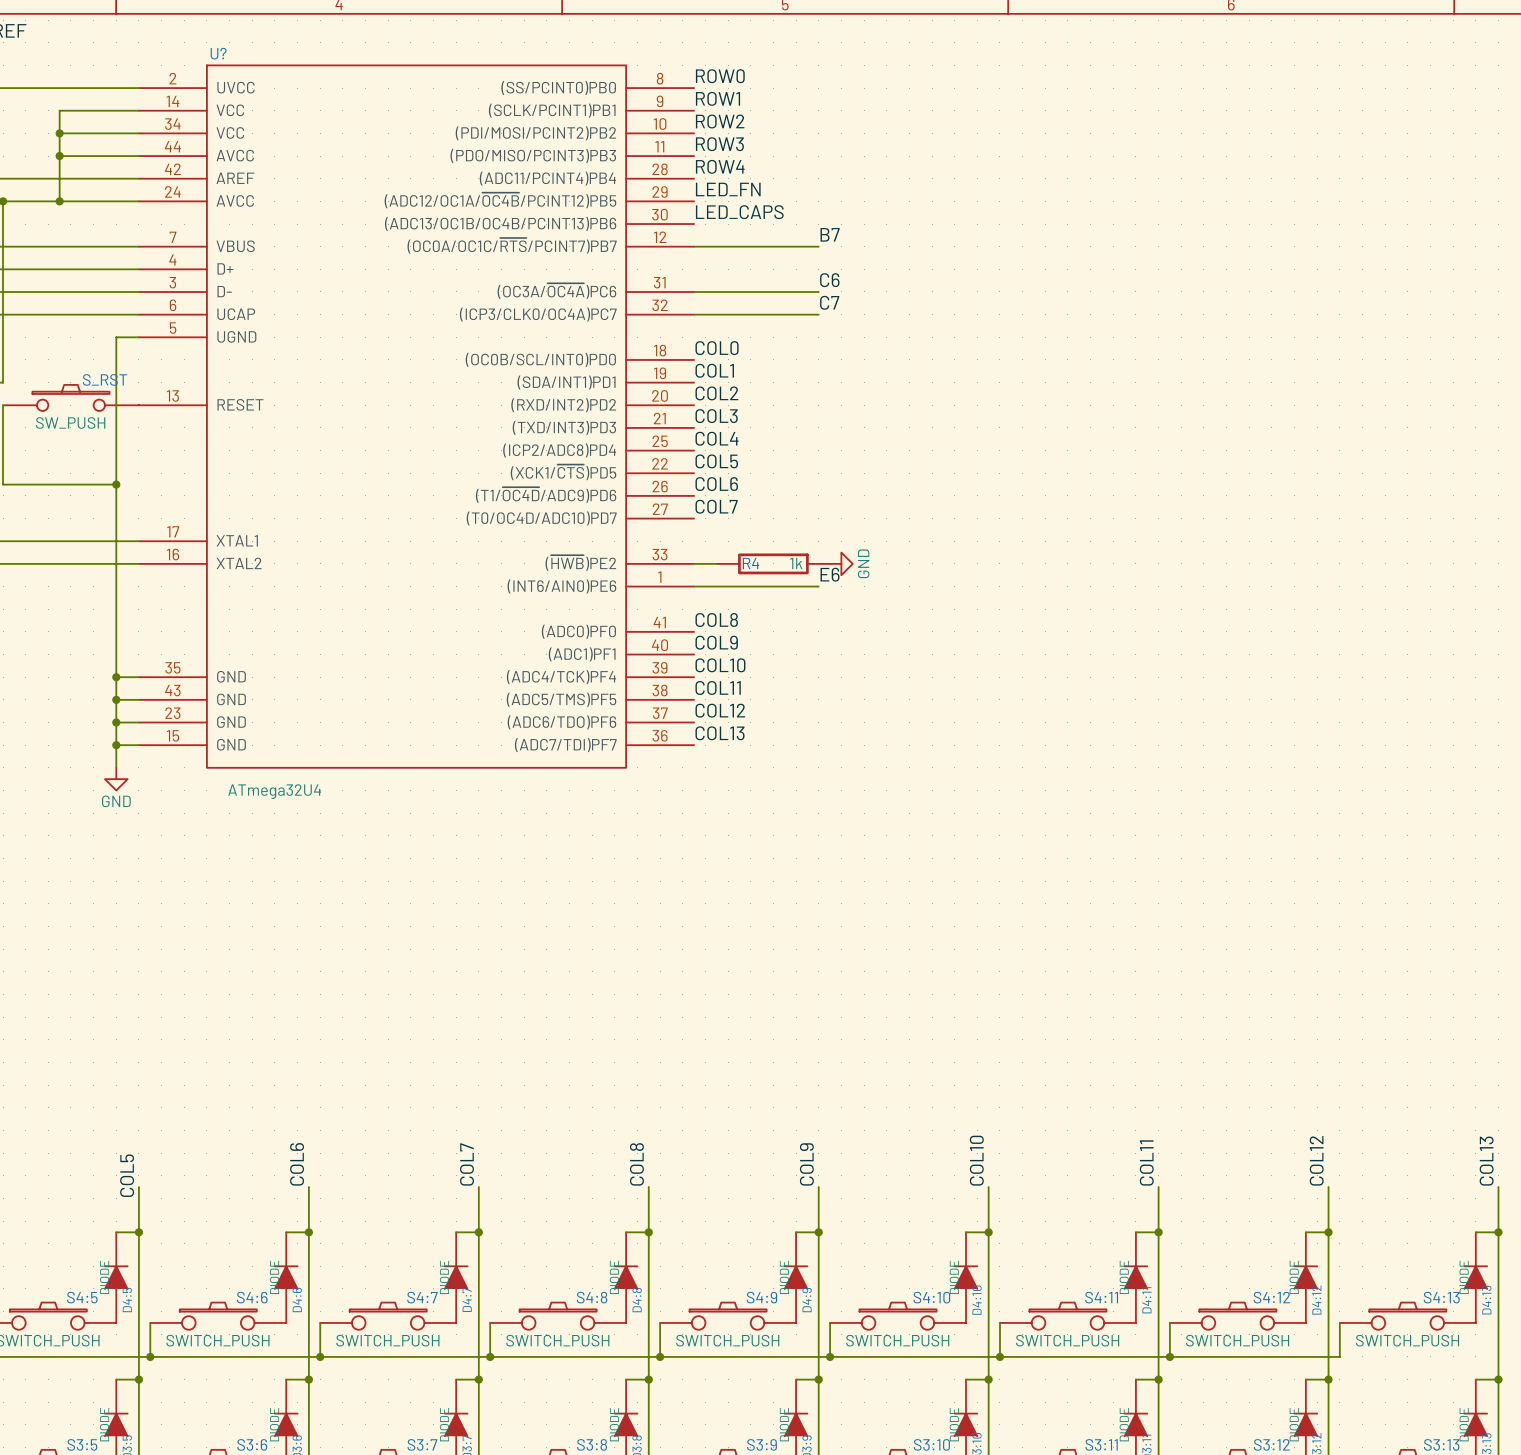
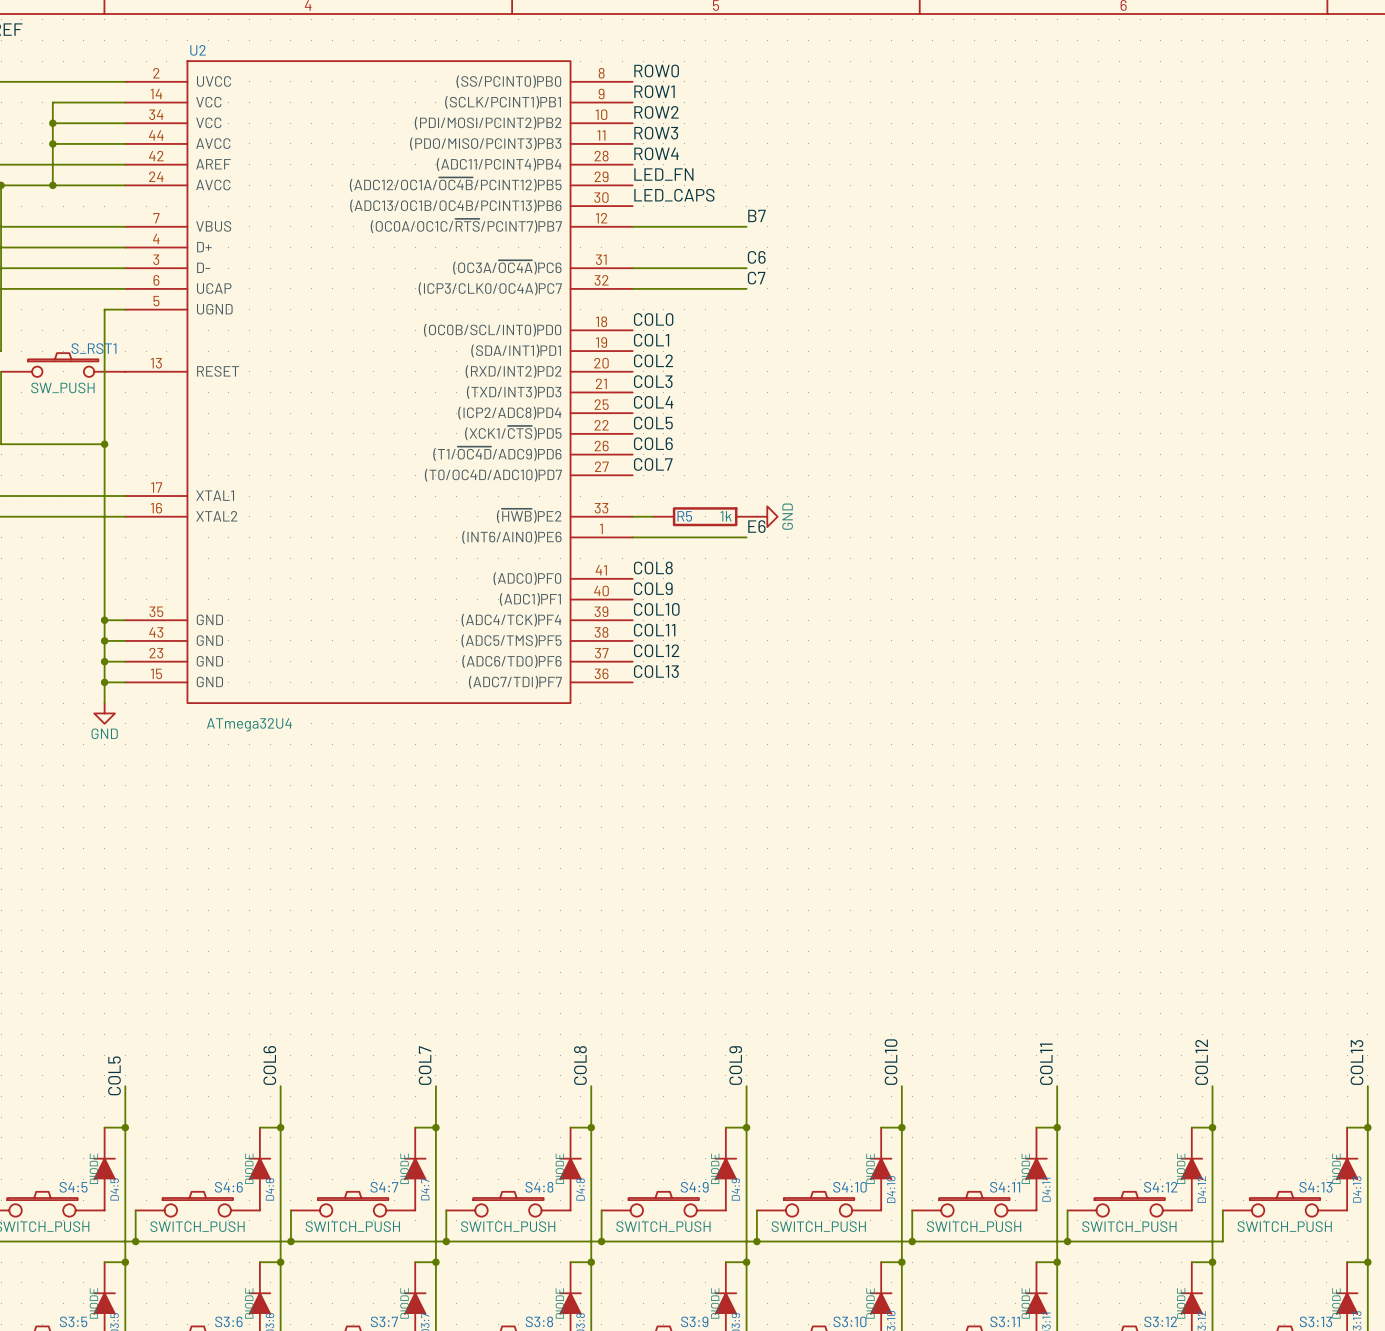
U? name: U? (218, 53) -> U2 (197, 50)
S_RST name: S_RST (105, 379) -> S_RST1 (93, 348)
R4 name: R4 (751, 563) -> R5 (684, 516)

